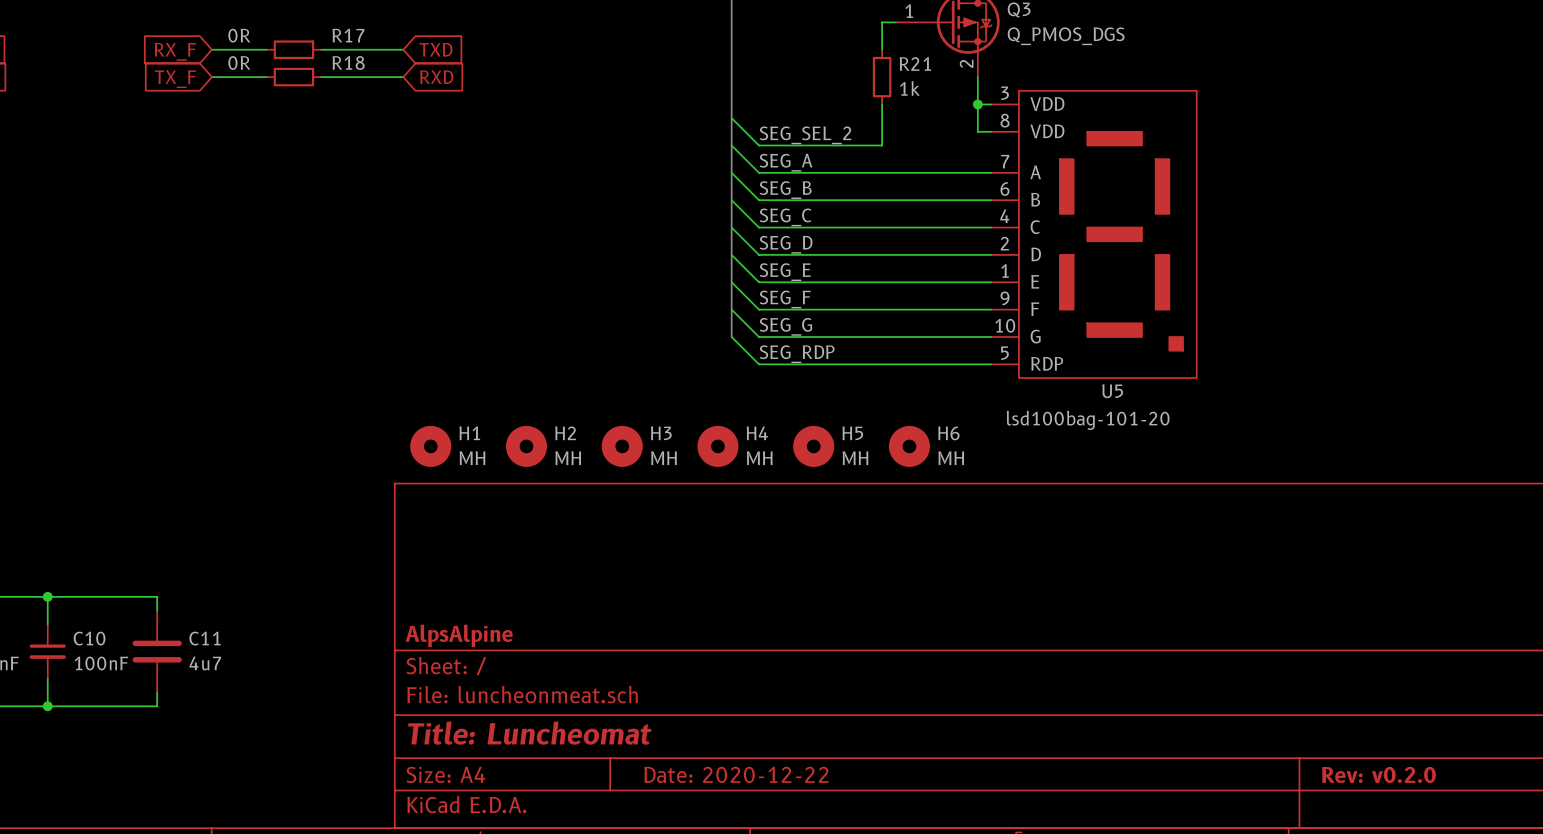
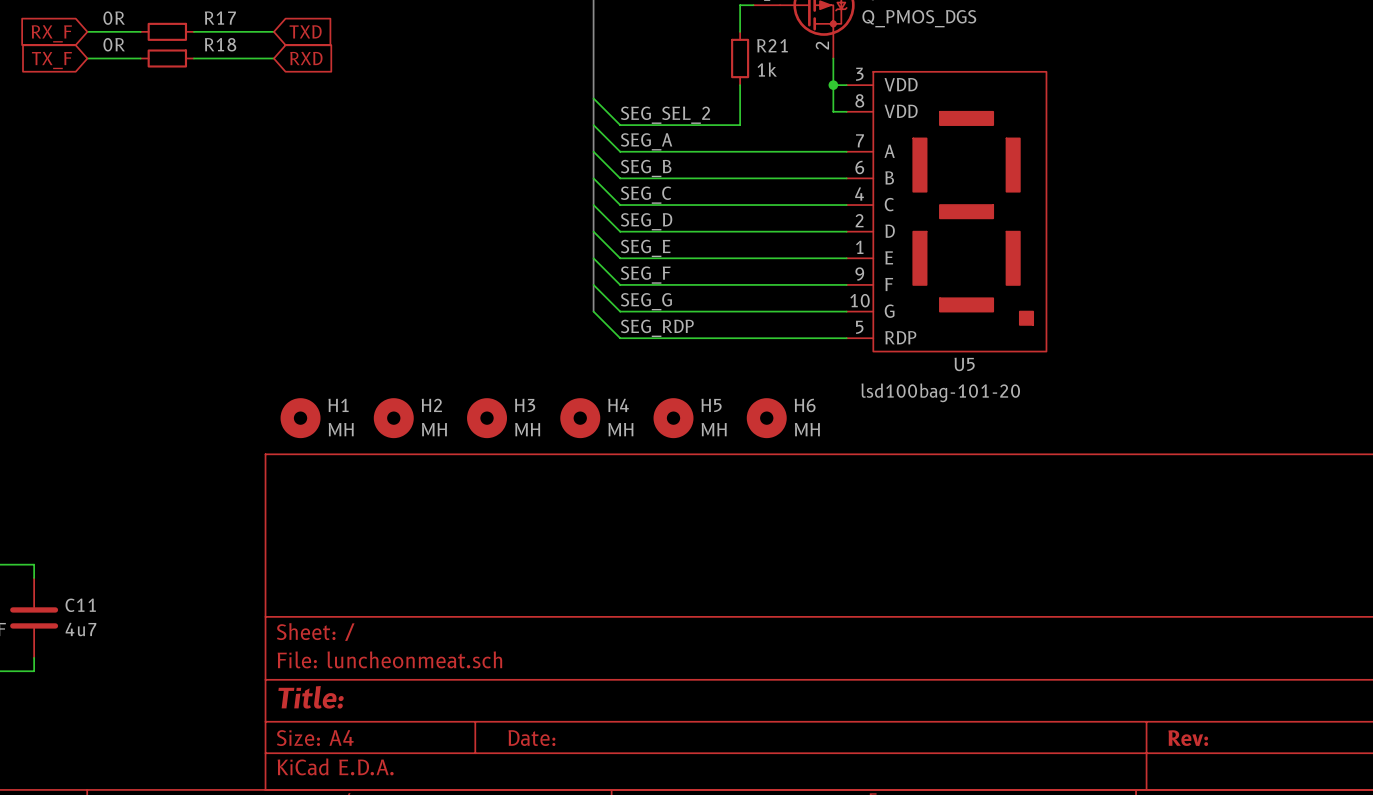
title block: AlpsAlpine (459, 635) -> none
title block: Title: Luncheomat (529, 733) -> Title: (311, 697)
title block: Date: 2020-12-22 (736, 774) -> Date: (531, 738)
title block: Rev: v0.2.0 (1378, 774) -> Rev: (1188, 738)

